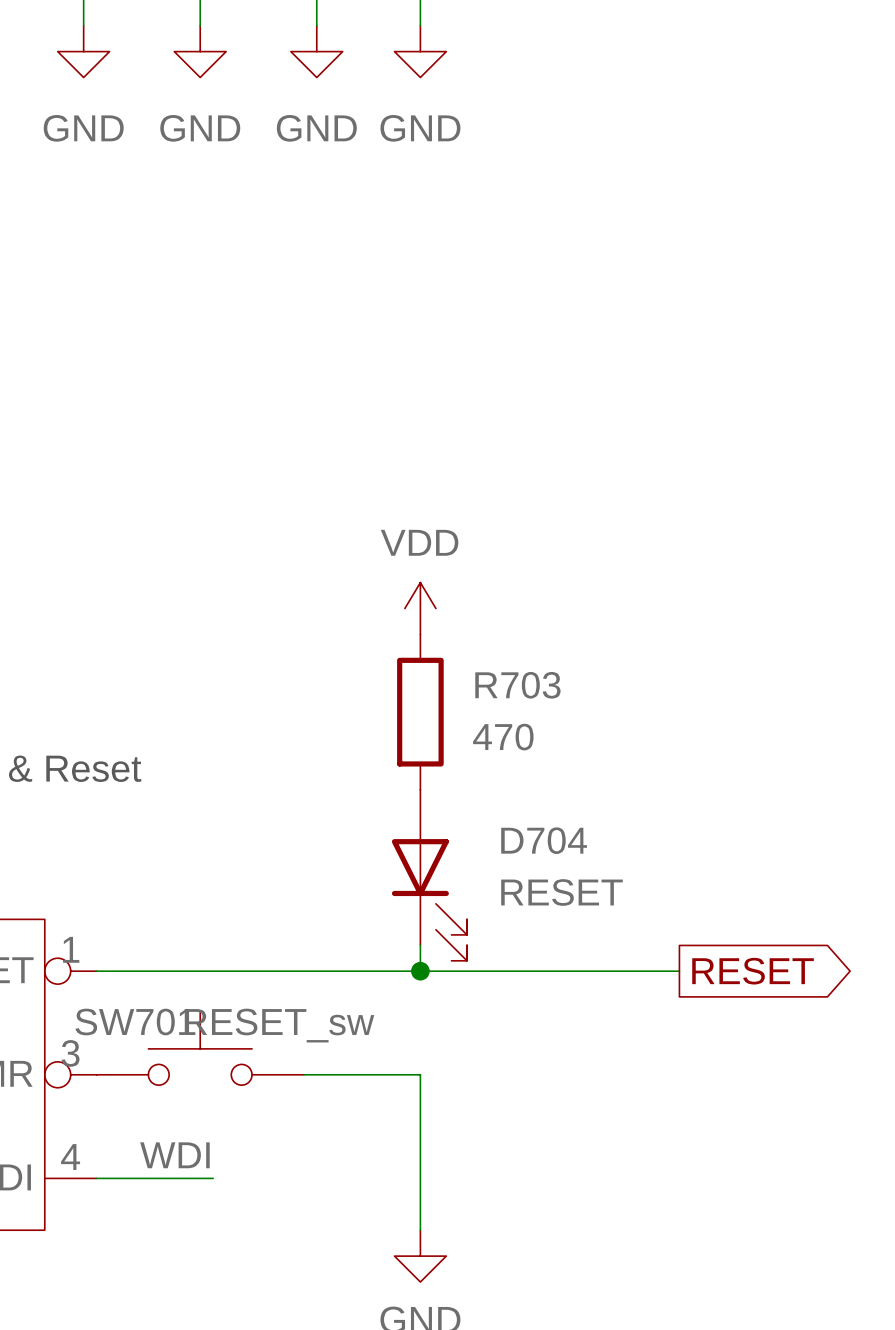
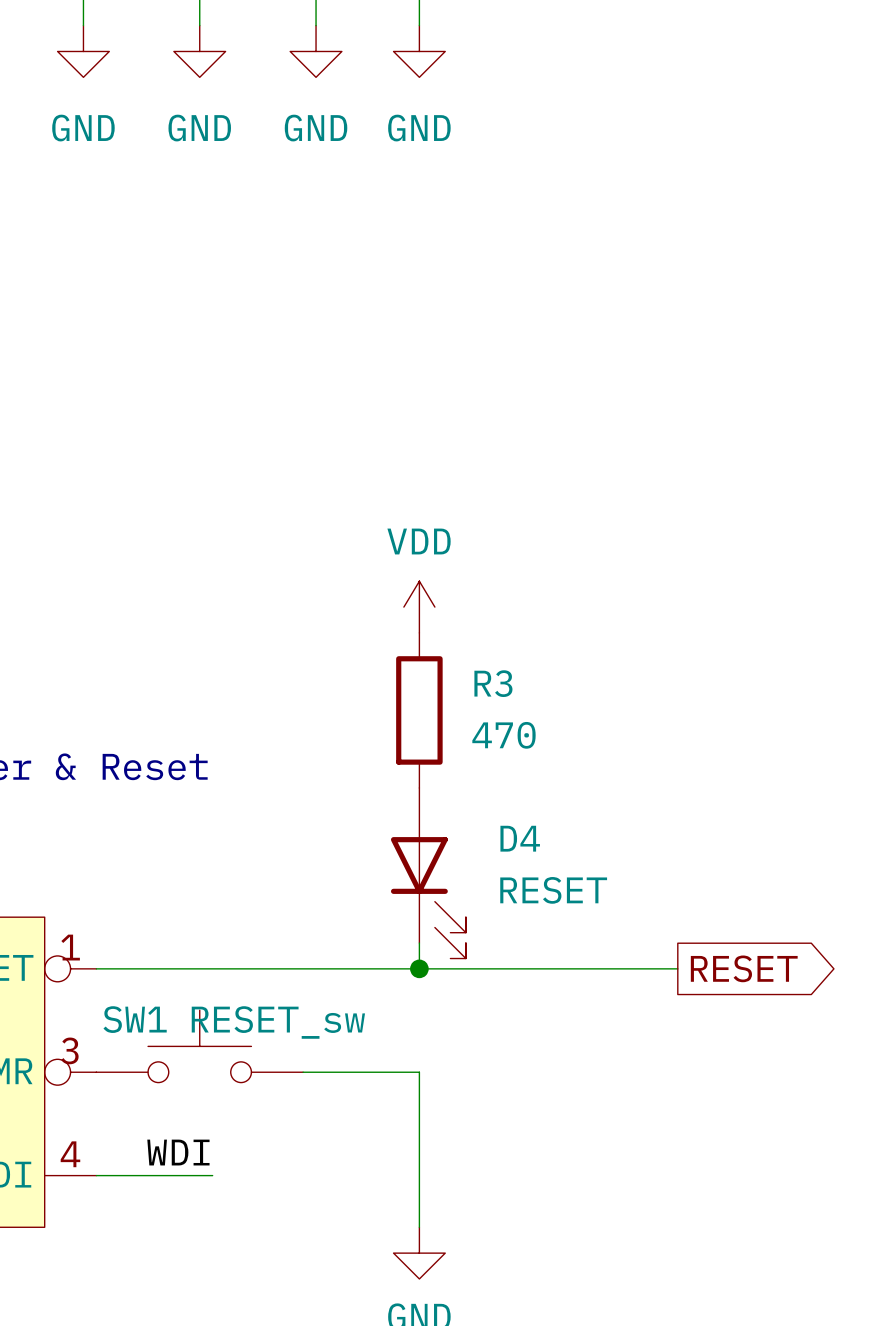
R703 name: R703 (517, 685) -> R3 (493, 683)
D704 name: D704 (544, 840) -> D4 (520, 838)
SW701 name: SW701 (135, 1022) -> SW1 (135, 1019)

